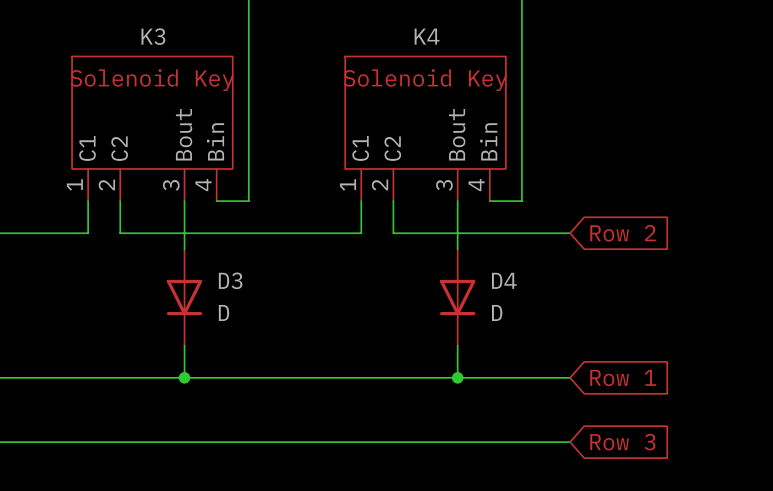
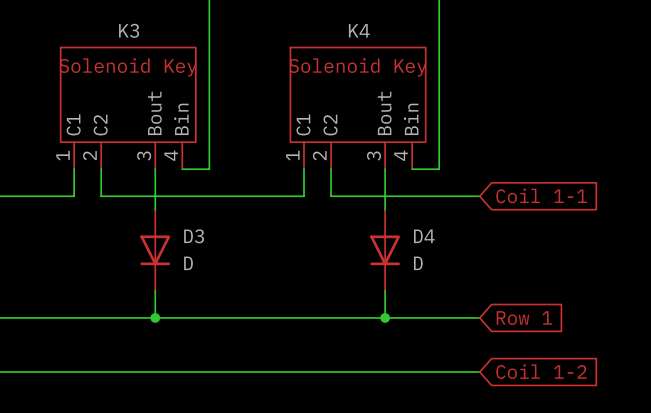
global label: Row 2 (623, 233) -> Coil 1-1 (541, 195)
global label: Row 3 (622, 442) -> Coil 1-2 (541, 371)

